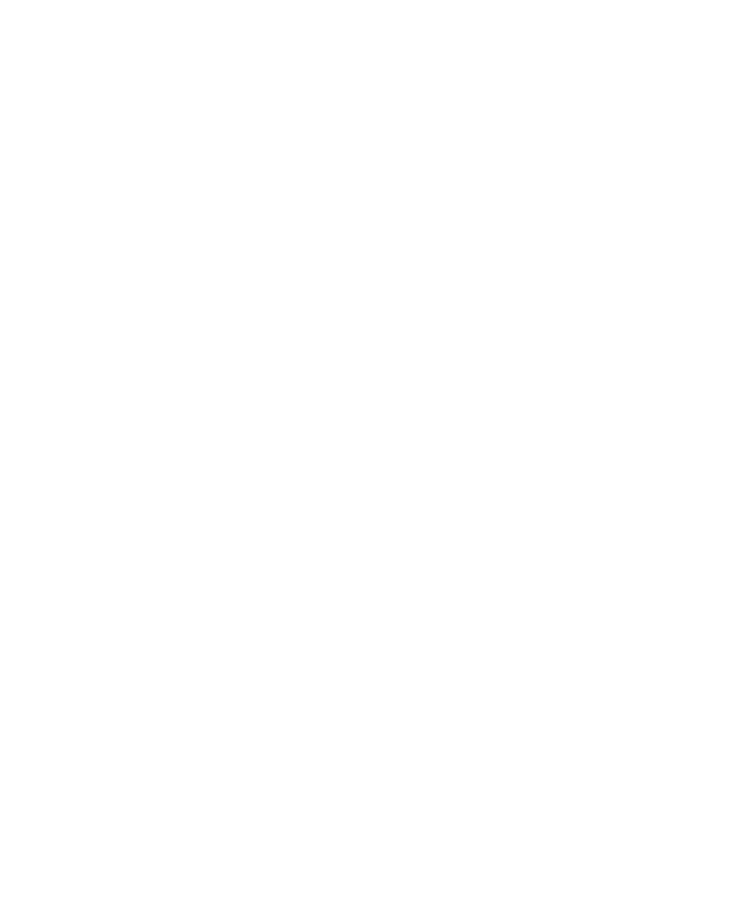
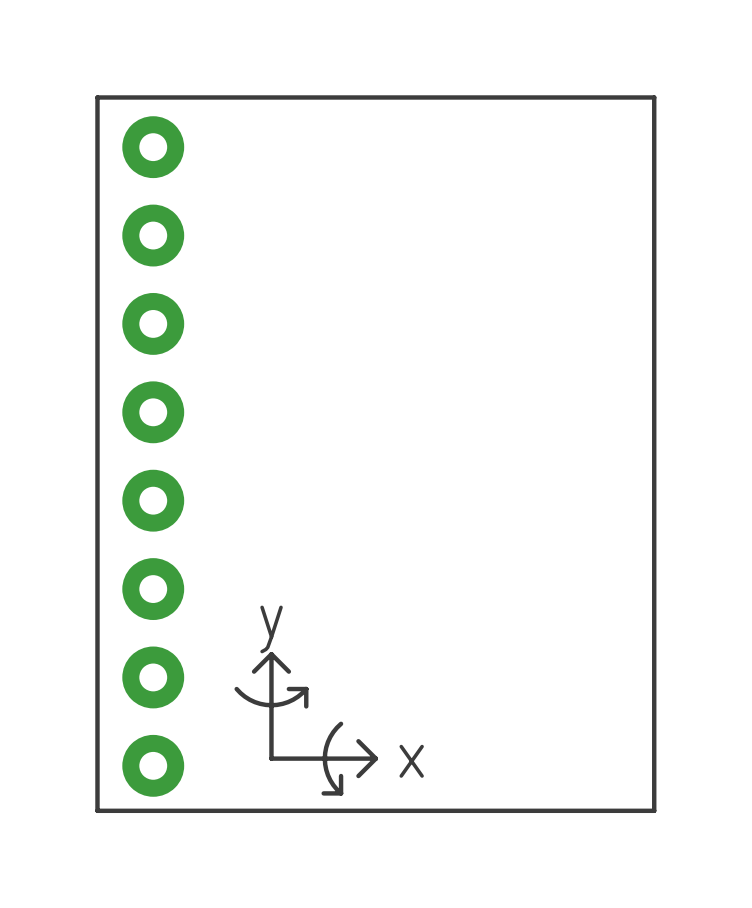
part: none -> (375, 454)

